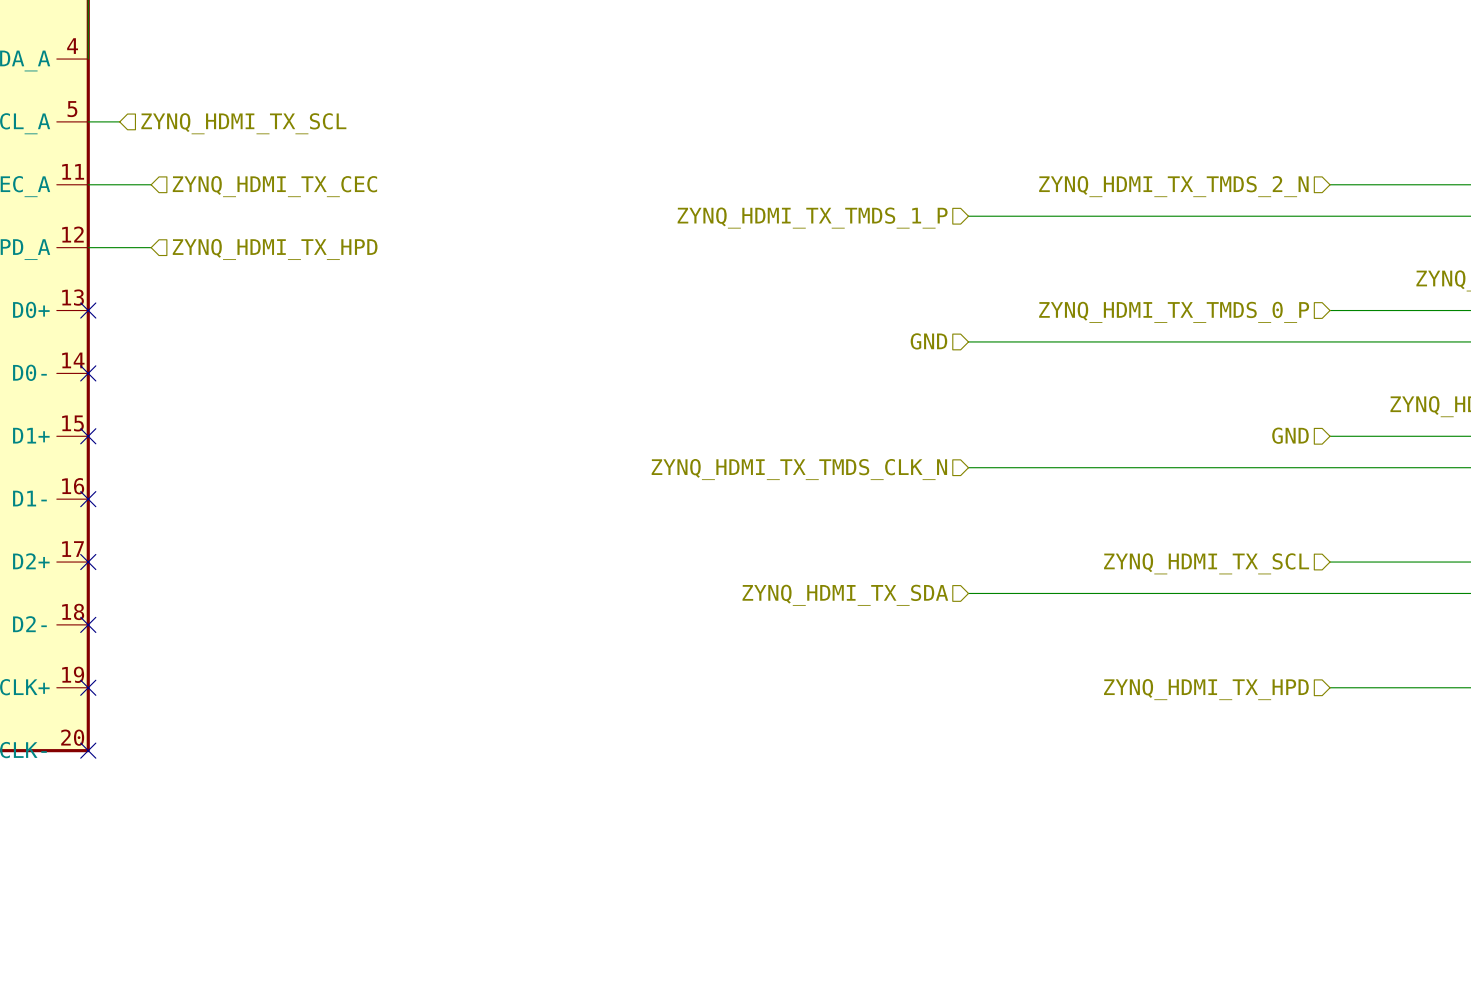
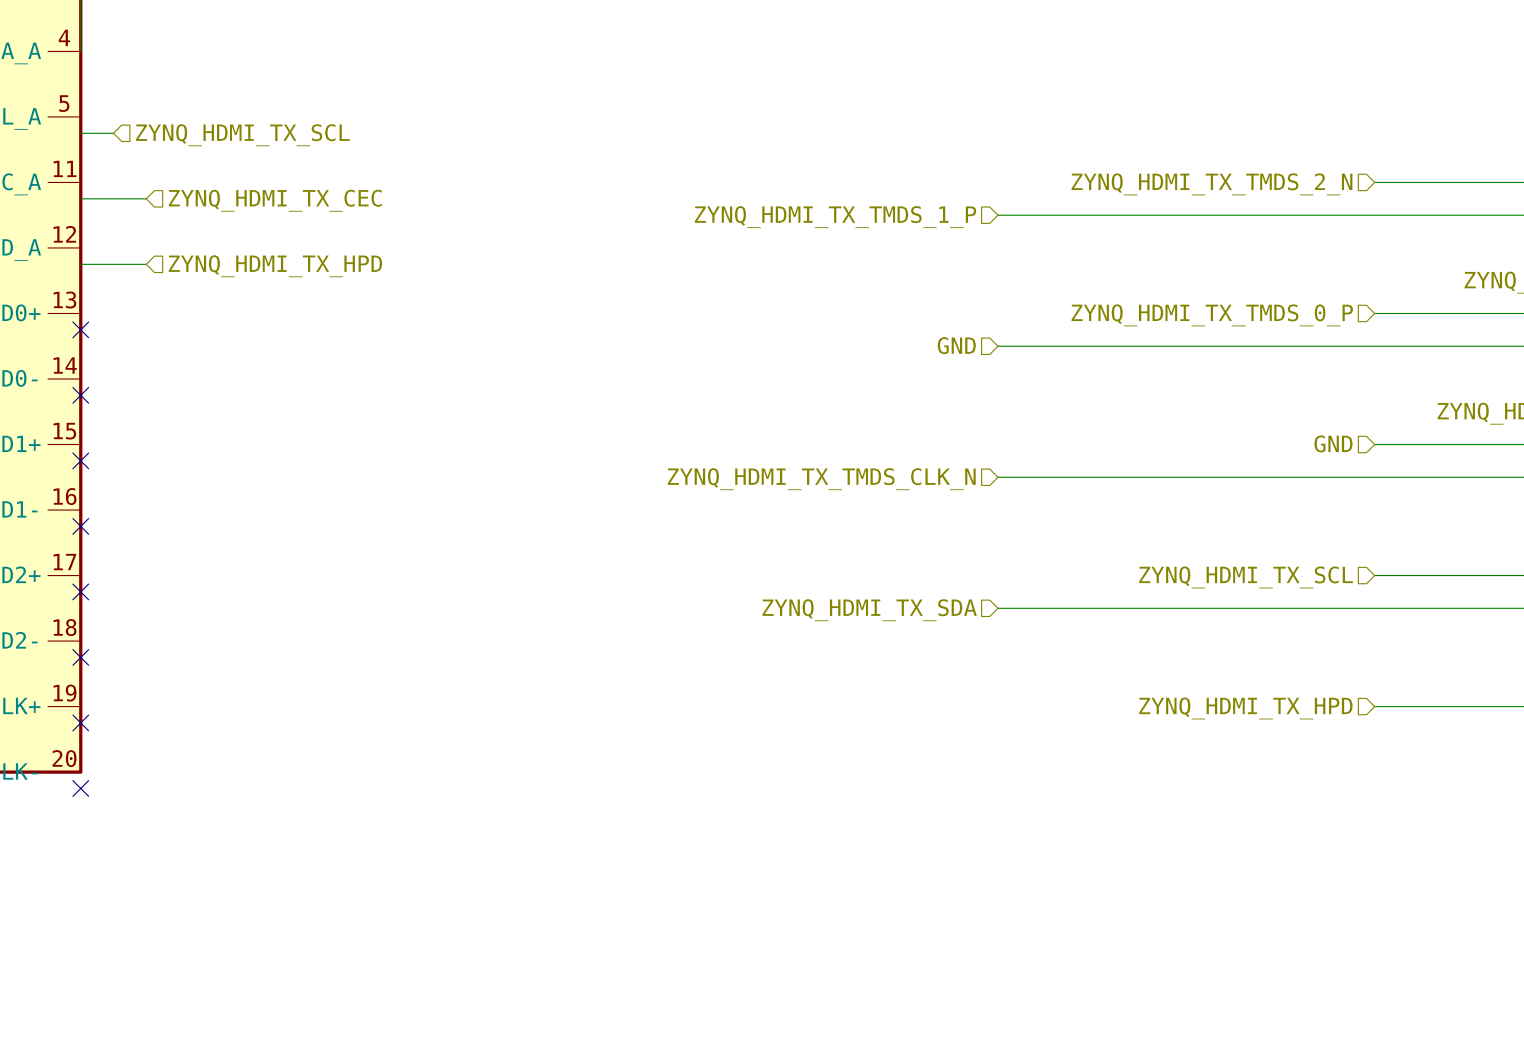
wire: (88, 121) (119, 121) -> (80, 133) (113, 133)
hierarchical label position: ZYNQ_HDMI_TX_SCL (243, 123) -> ZYNQ_HDMI_TX_SCL (242, 135)
wire: (88, 184) (151, 184) -> (80, 198) (146, 198)
hierarchical label position: ZYNQ_HDMI_TX_CEC (274, 186) -> ZYNQ_HDMI_TX_CEC (275, 200)
wire: (88, 247) (151, 247) -> (80, 264) (146, 264)
hierarchical label position: ZYNQ_HDMI_TX_HPD (275, 249) -> ZYNQ_HDMI_TX_HPD (275, 266)
no-connect mark position: (88, 310) -> (80, 329)
no-connect mark position: (88, 373) -> (80, 395)
no-connect mark position: (88, 436) -> (80, 460)
no-connect mark position: (88, 499) -> (80, 526)
no-connect mark position: (88, 562) -> (80, 591)
no-connect mark position: (88, 624) -> (80, 657)
no-connect mark position: (88, 687) -> (80, 722)
no-connect mark position: (88, 750) -> (80, 788)

